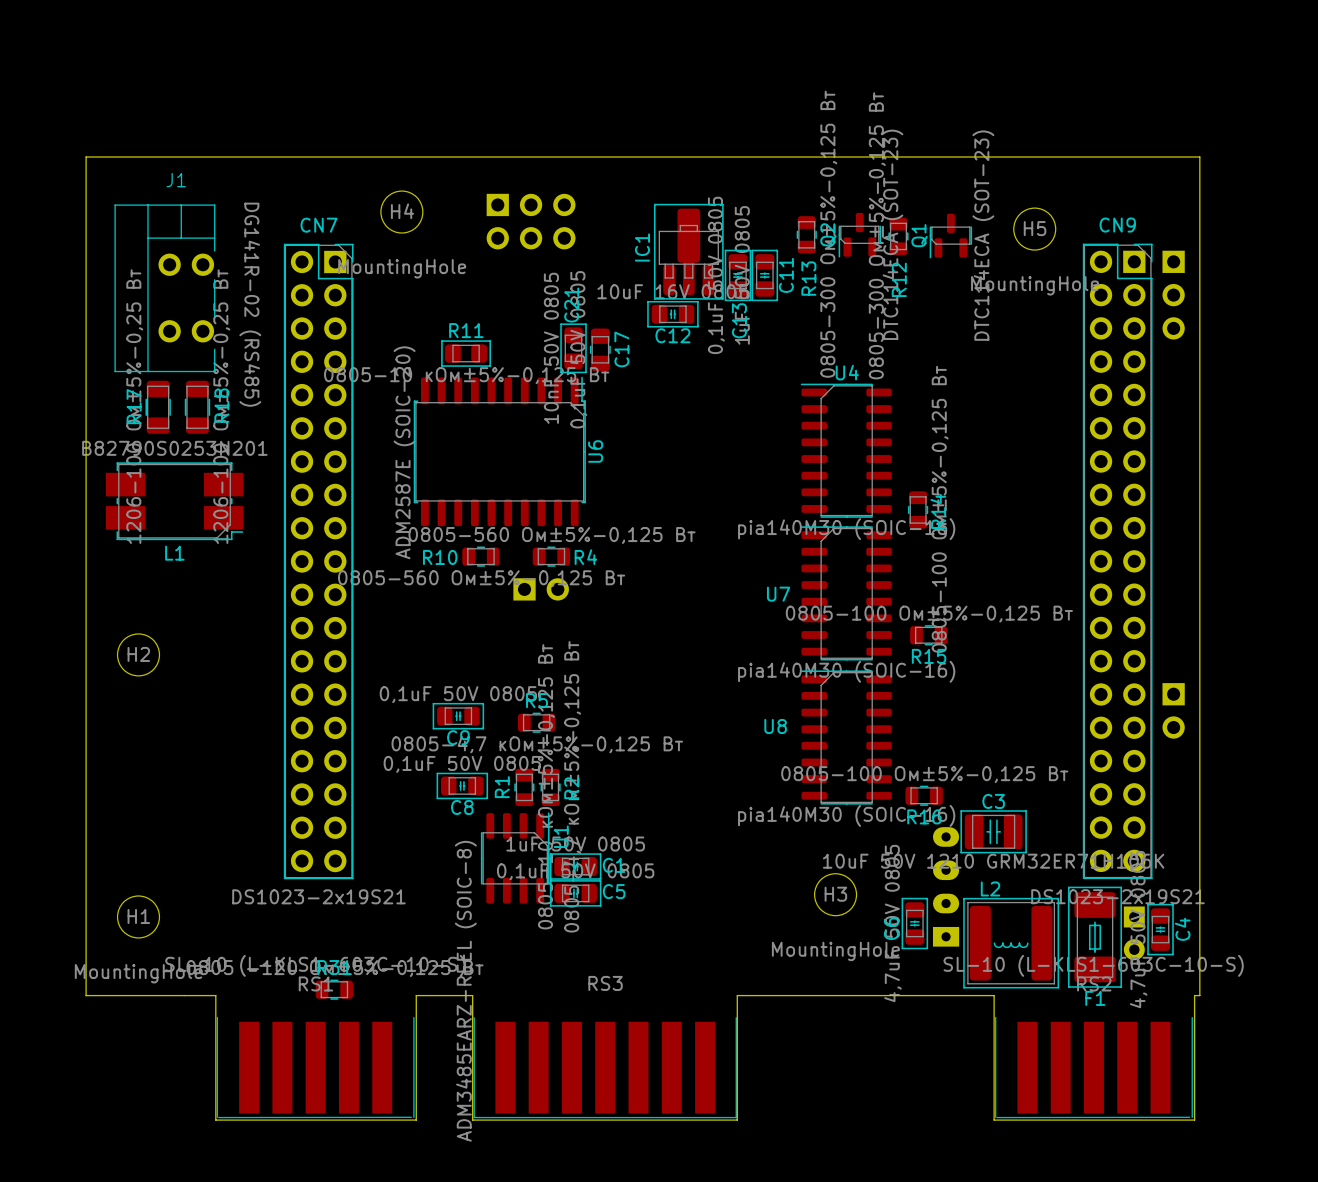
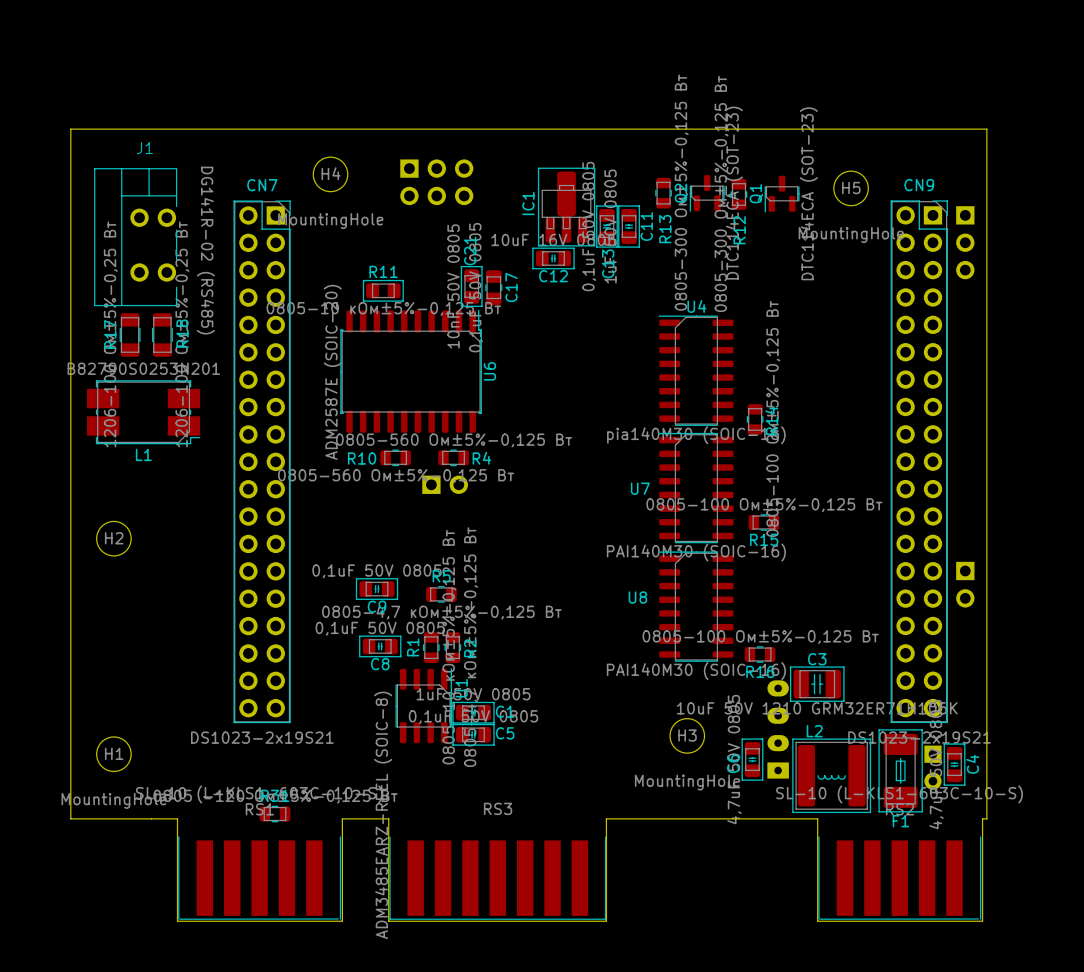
U7 value: pia140M30 (SOIC-16) (846, 671) -> PAI140M30 (SOIC-16) (696, 552)
U8 value: pia140M30 (SOIC-16) (846, 815) -> PAI140M30 (SOIC-16) (696, 671)

